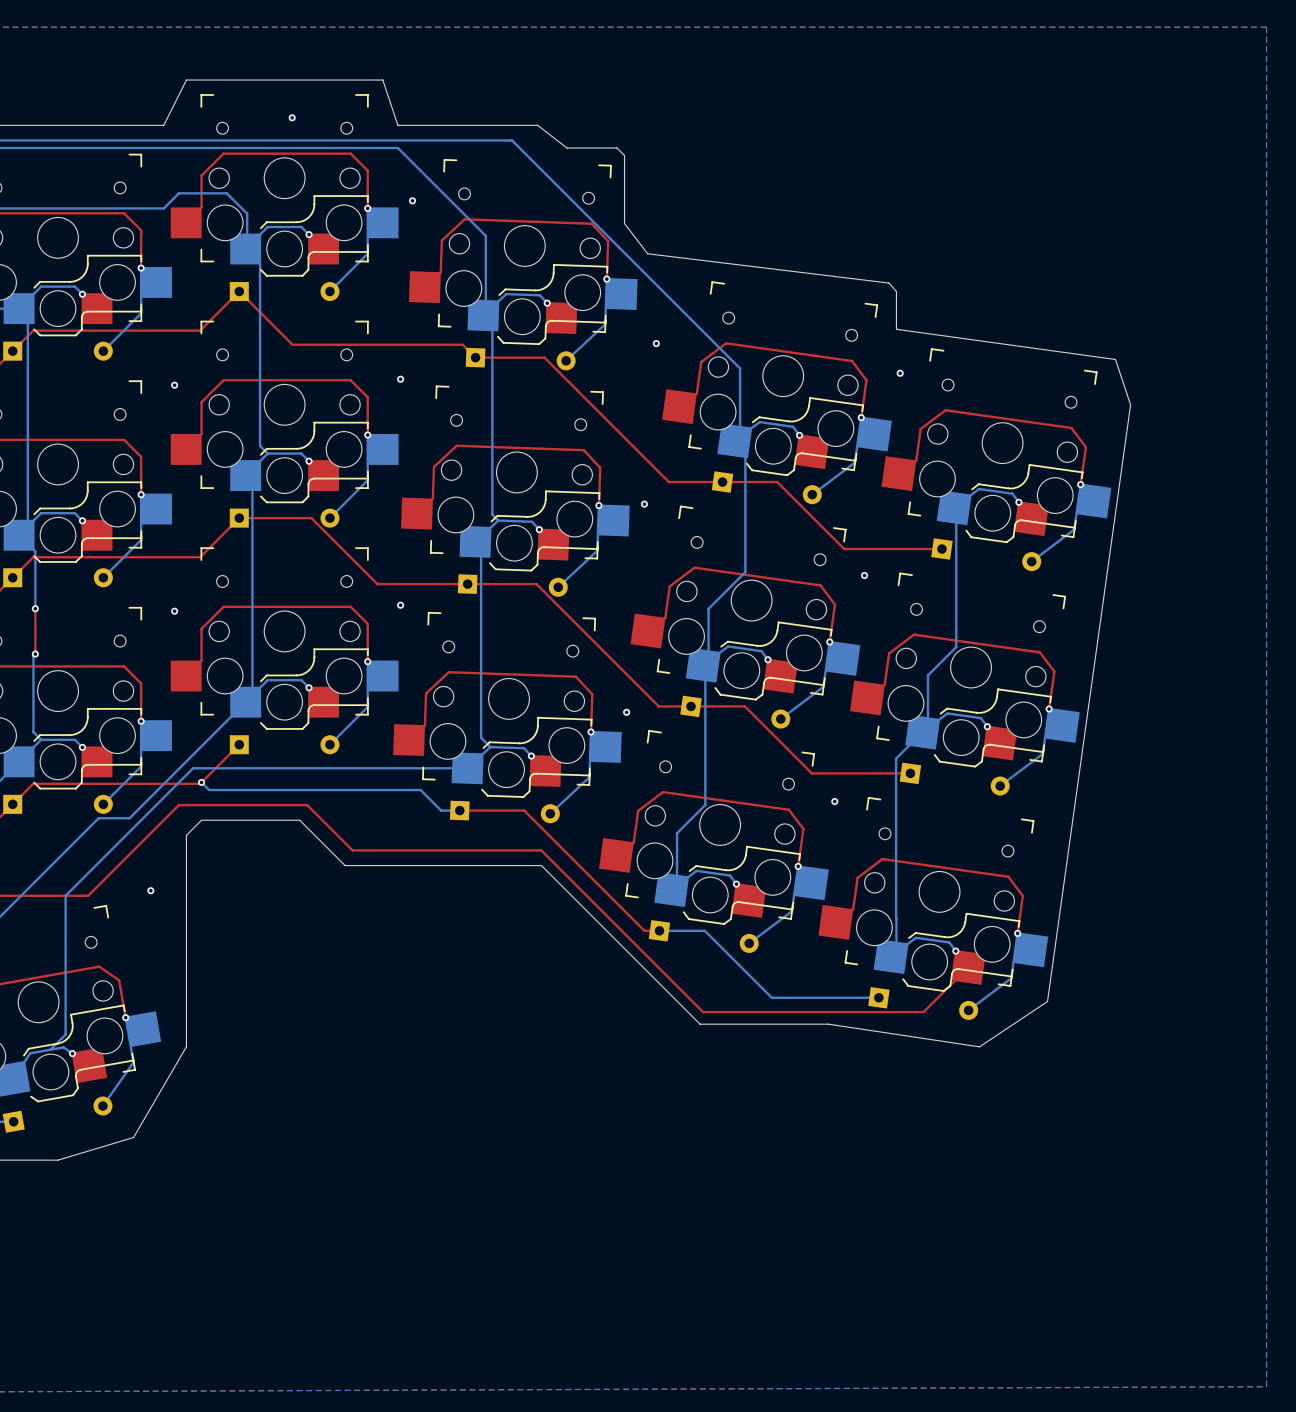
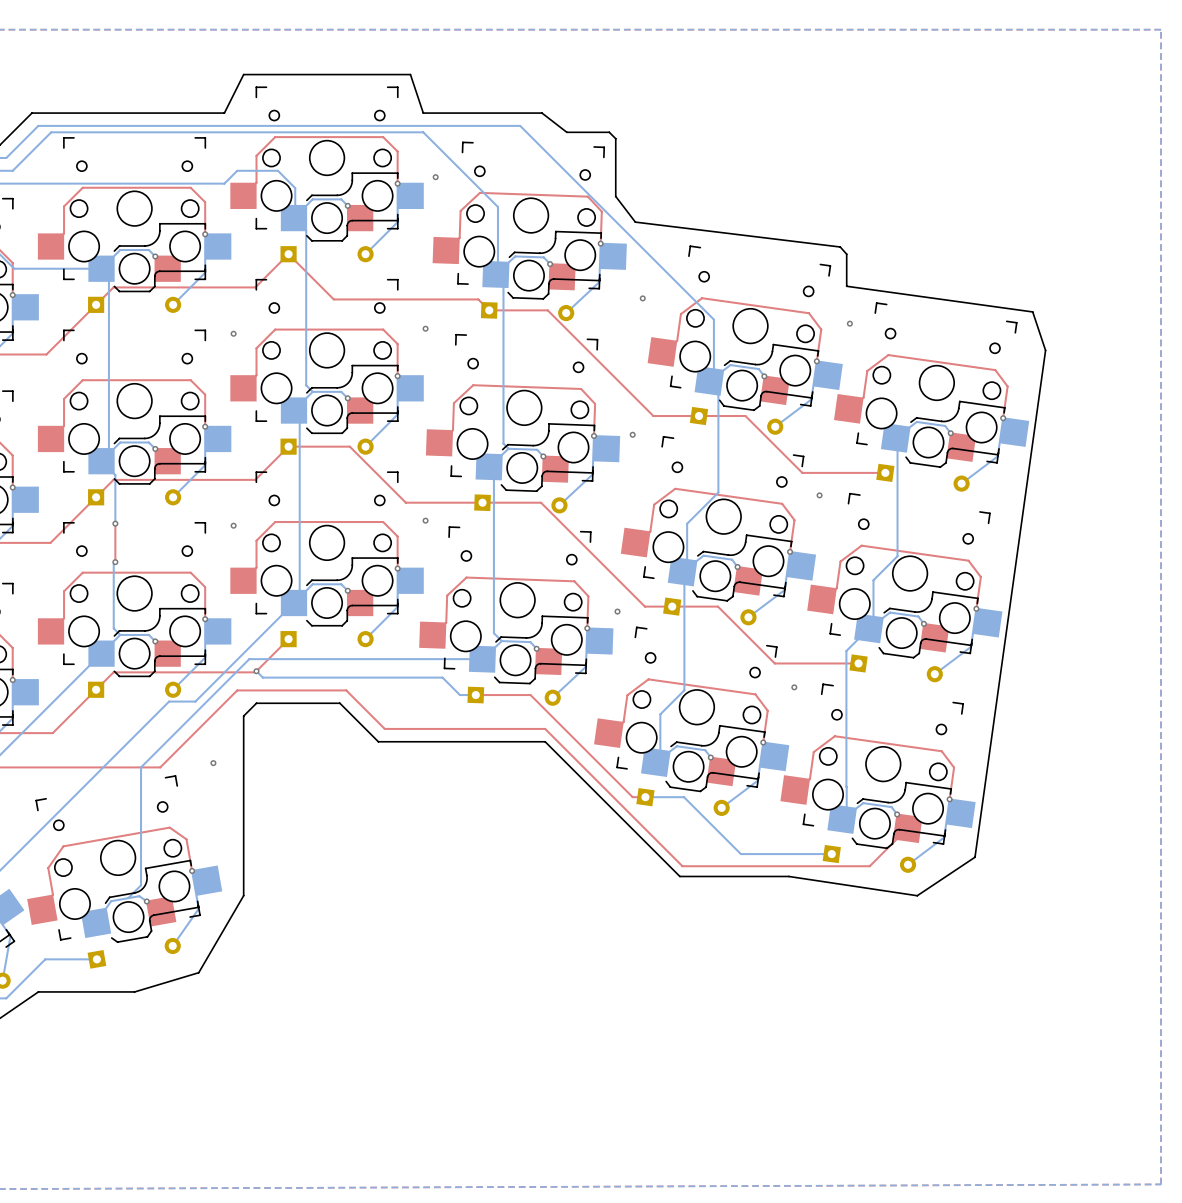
via: (292, 117) -> none

